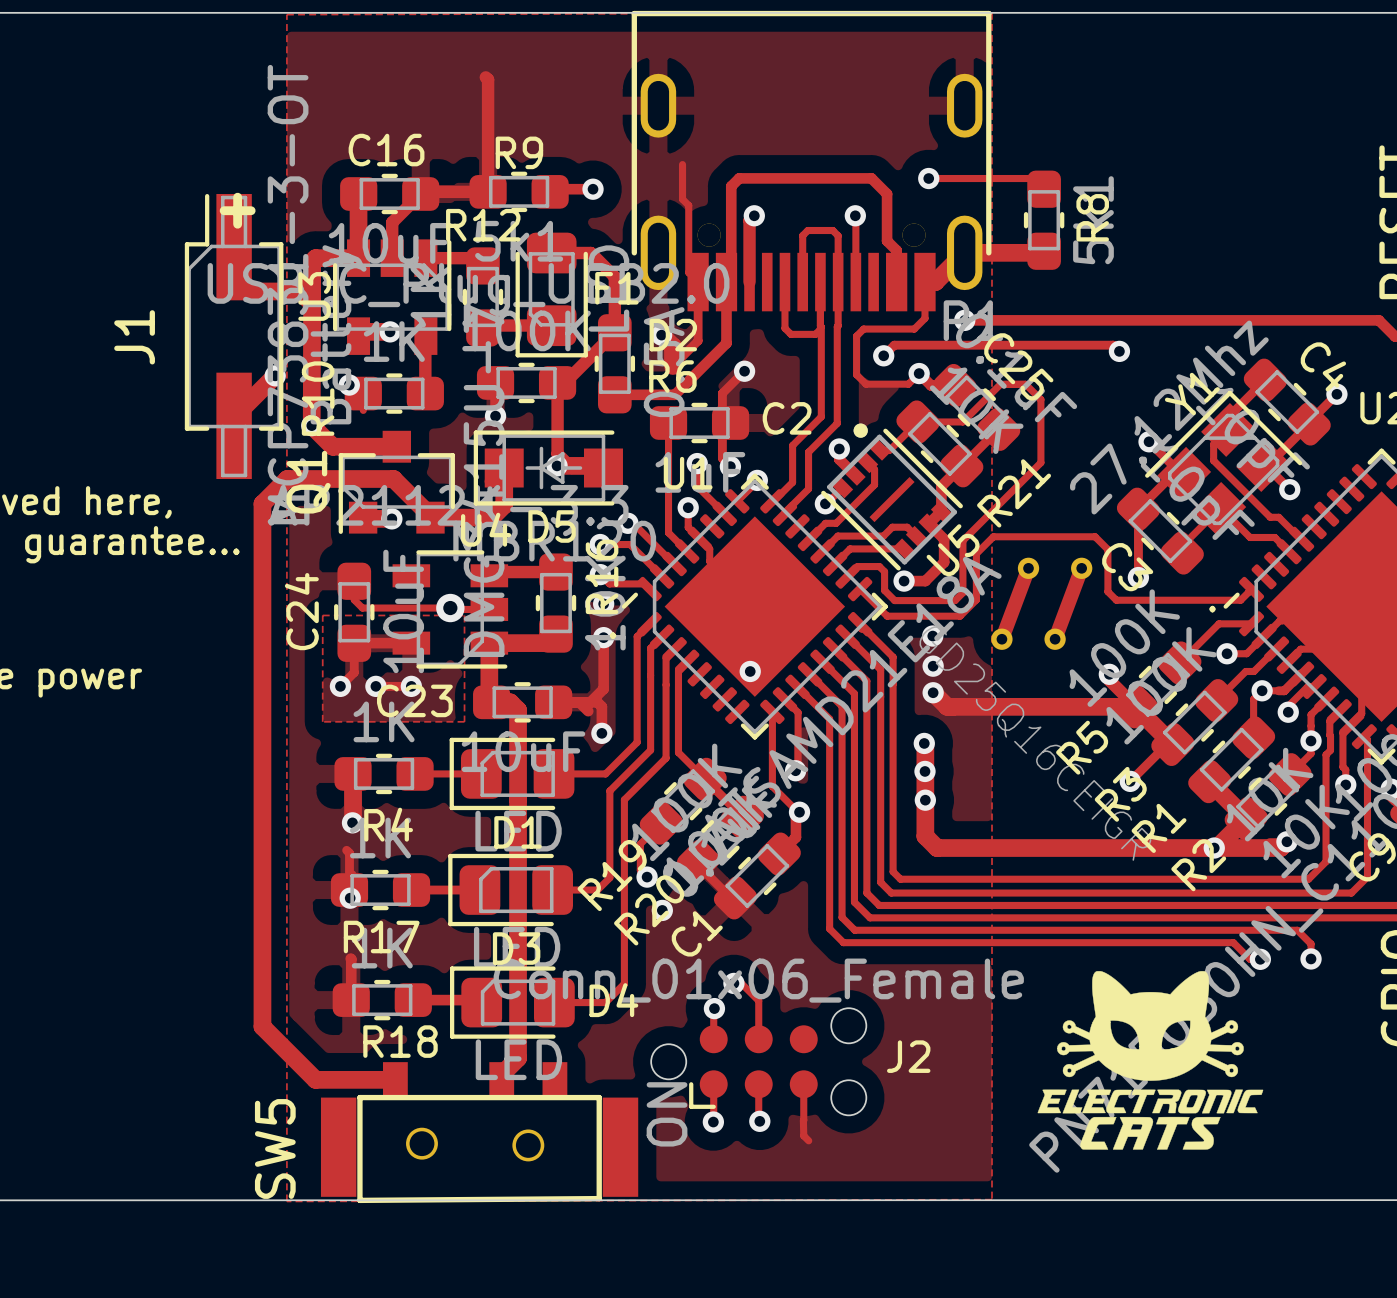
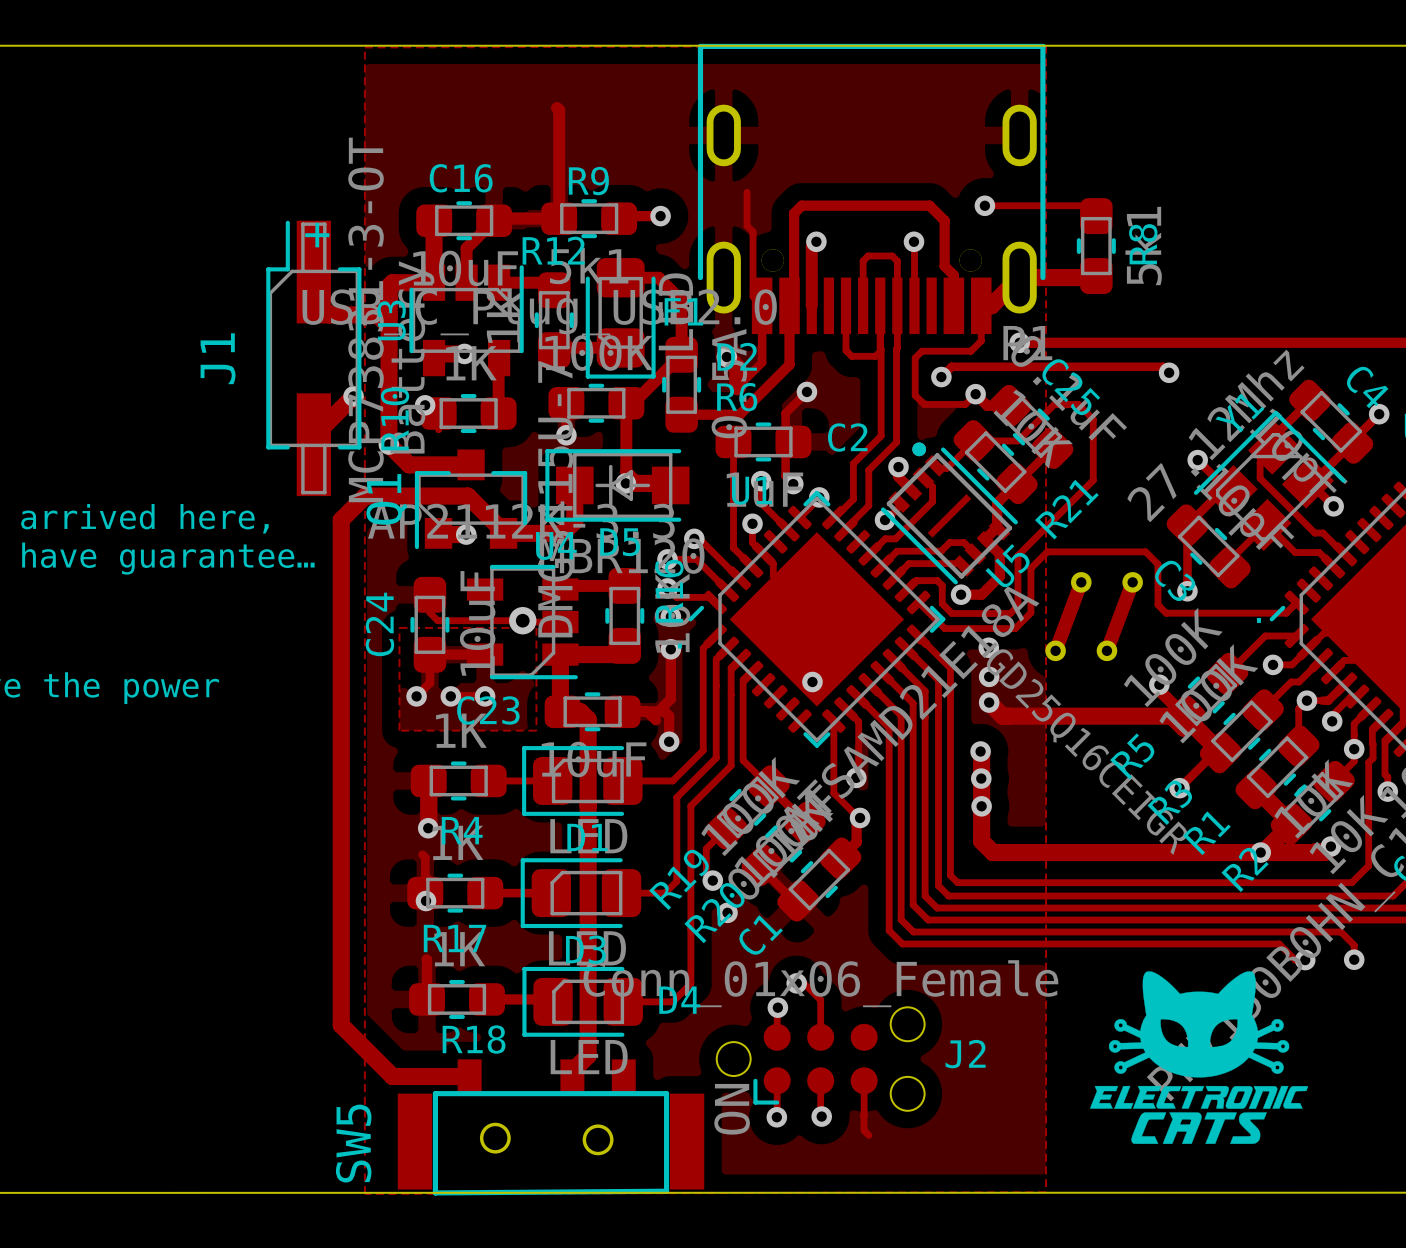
U5 footprint: [821, 423, 963, 571] -> [880, 442, 1018, 585]

